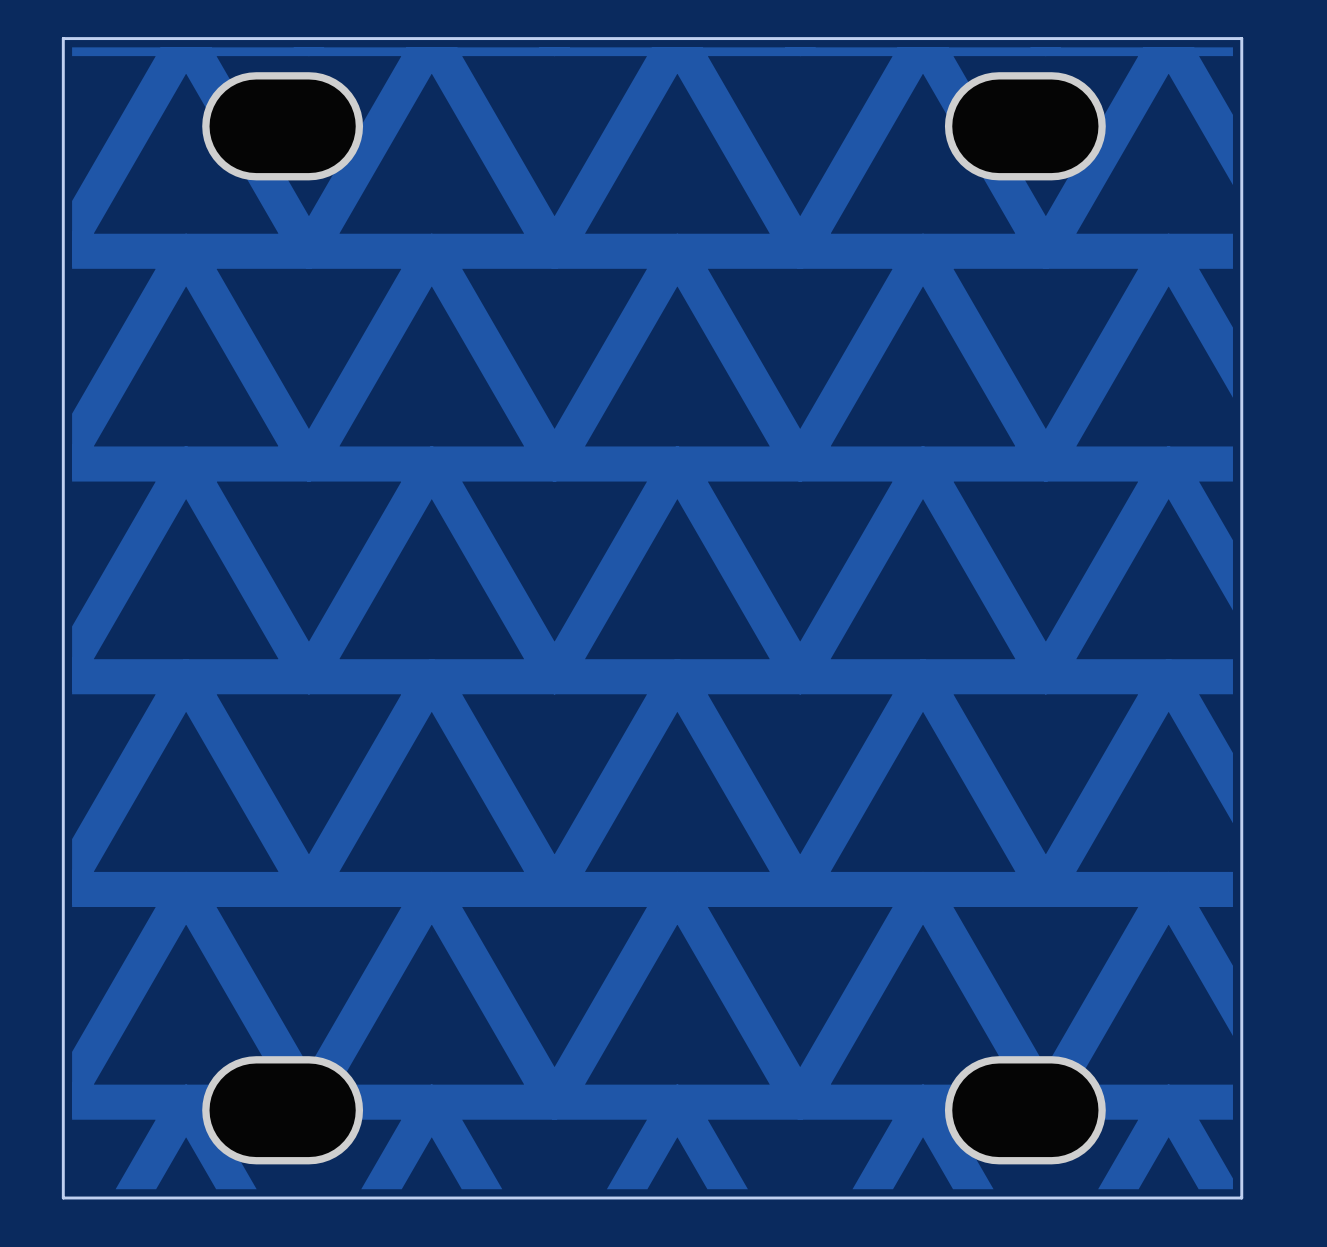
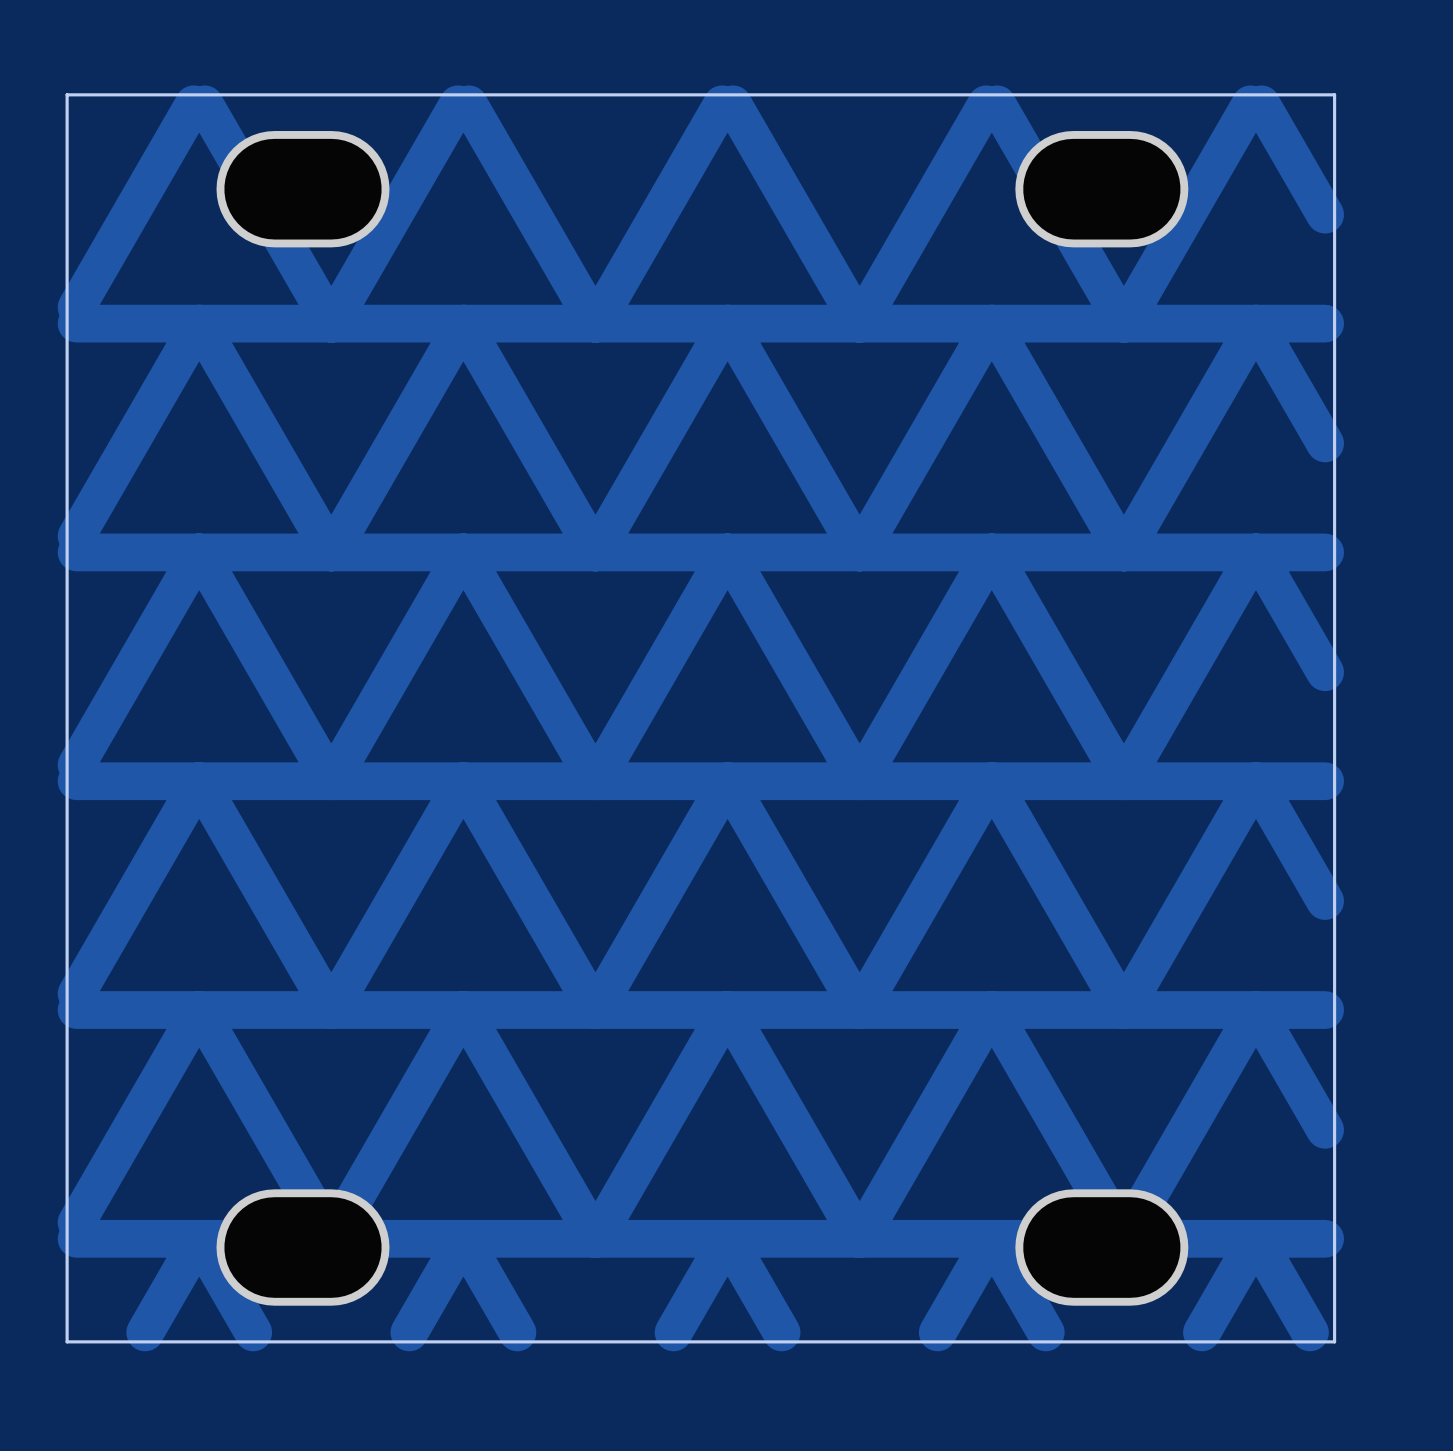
drawing: [72, 47, 1233, 1190] -> none
track: none -> (193, 104) (76, 307)
track: none -> (204, 104) (331, 323) (457, 104)
track: none -> (468, 104) (595, 323) (722, 104)
track: none -> (733, 104) (859, 323) (986, 104)
track: none -> (997, 104) (1123, 323) (1250, 104)
track: none -> (1261, 104) (1325, 214)
track: none -> (76, 323) (1325, 323)
track: none -> (1325, 443) (1255, 323) (1123, 552) (991, 323) (859, 552) (727, 323) (595, 552) (463, 323) (331, 552) (199, 323) (76, 536)
track: none -> (76, 552) (1325, 552)
track: none -> (1325, 672) (1255, 552) (1123, 781) (991, 552) (859, 781) (727, 552) (595, 781) (463, 552) (331, 781) (199, 552) (76, 764)
track: none -> (76, 781) (1325, 781)
track: none -> (1325, 901) (1255, 781) (1123, 1010) (991, 781) (859, 1010) (727, 781) (595, 1010) (463, 781) (331, 1010) (199, 781) (76, 993)
track: none -> (76, 1010) (1325, 1010)
track: none -> (1325, 1129) (1255, 1010) (1123, 1238) (991, 1010) (859, 1238) (727, 1010) (595, 1238) (463, 1010) (331, 1238) (199, 1010) (76, 1222)
track: none -> (76, 1238) (1325, 1238)
track: none -> (145, 1332) (199, 1238) (253, 1332)
track: none -> (409, 1332) (463, 1238) (517, 1332)
track: none -> (673, 1332) (727, 1238) (781, 1332)
track: none -> (937, 1332) (991, 1238) (1045, 1332)
track: none -> (1201, 1332) (1255, 1238) (1310, 1332)

